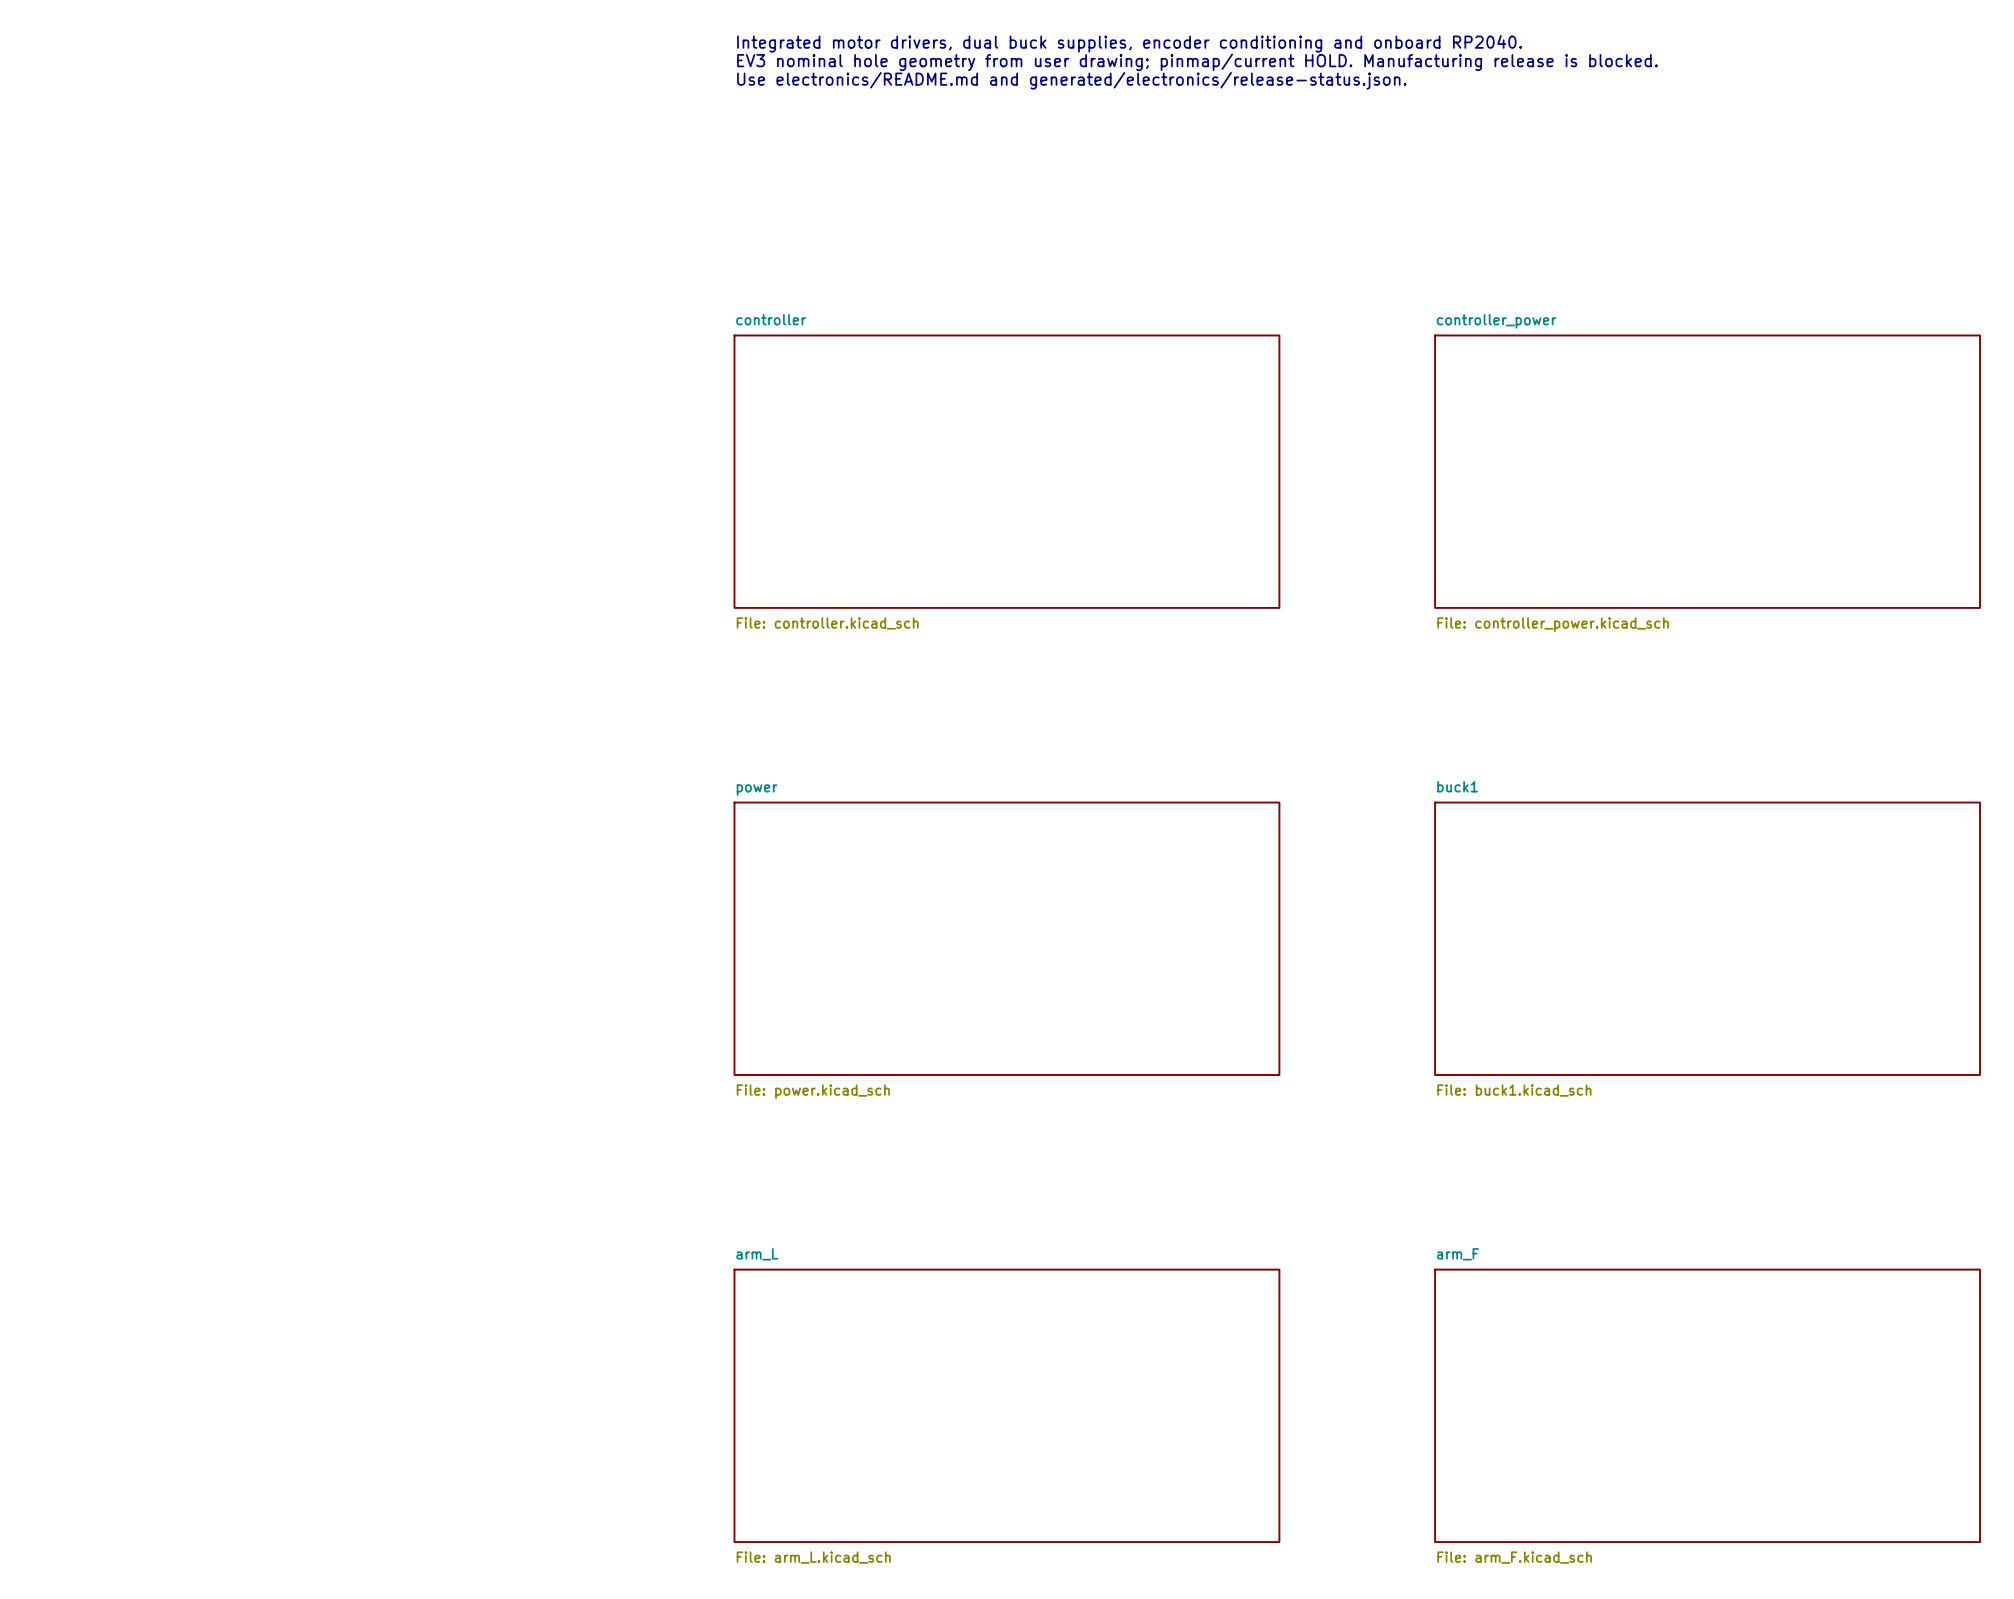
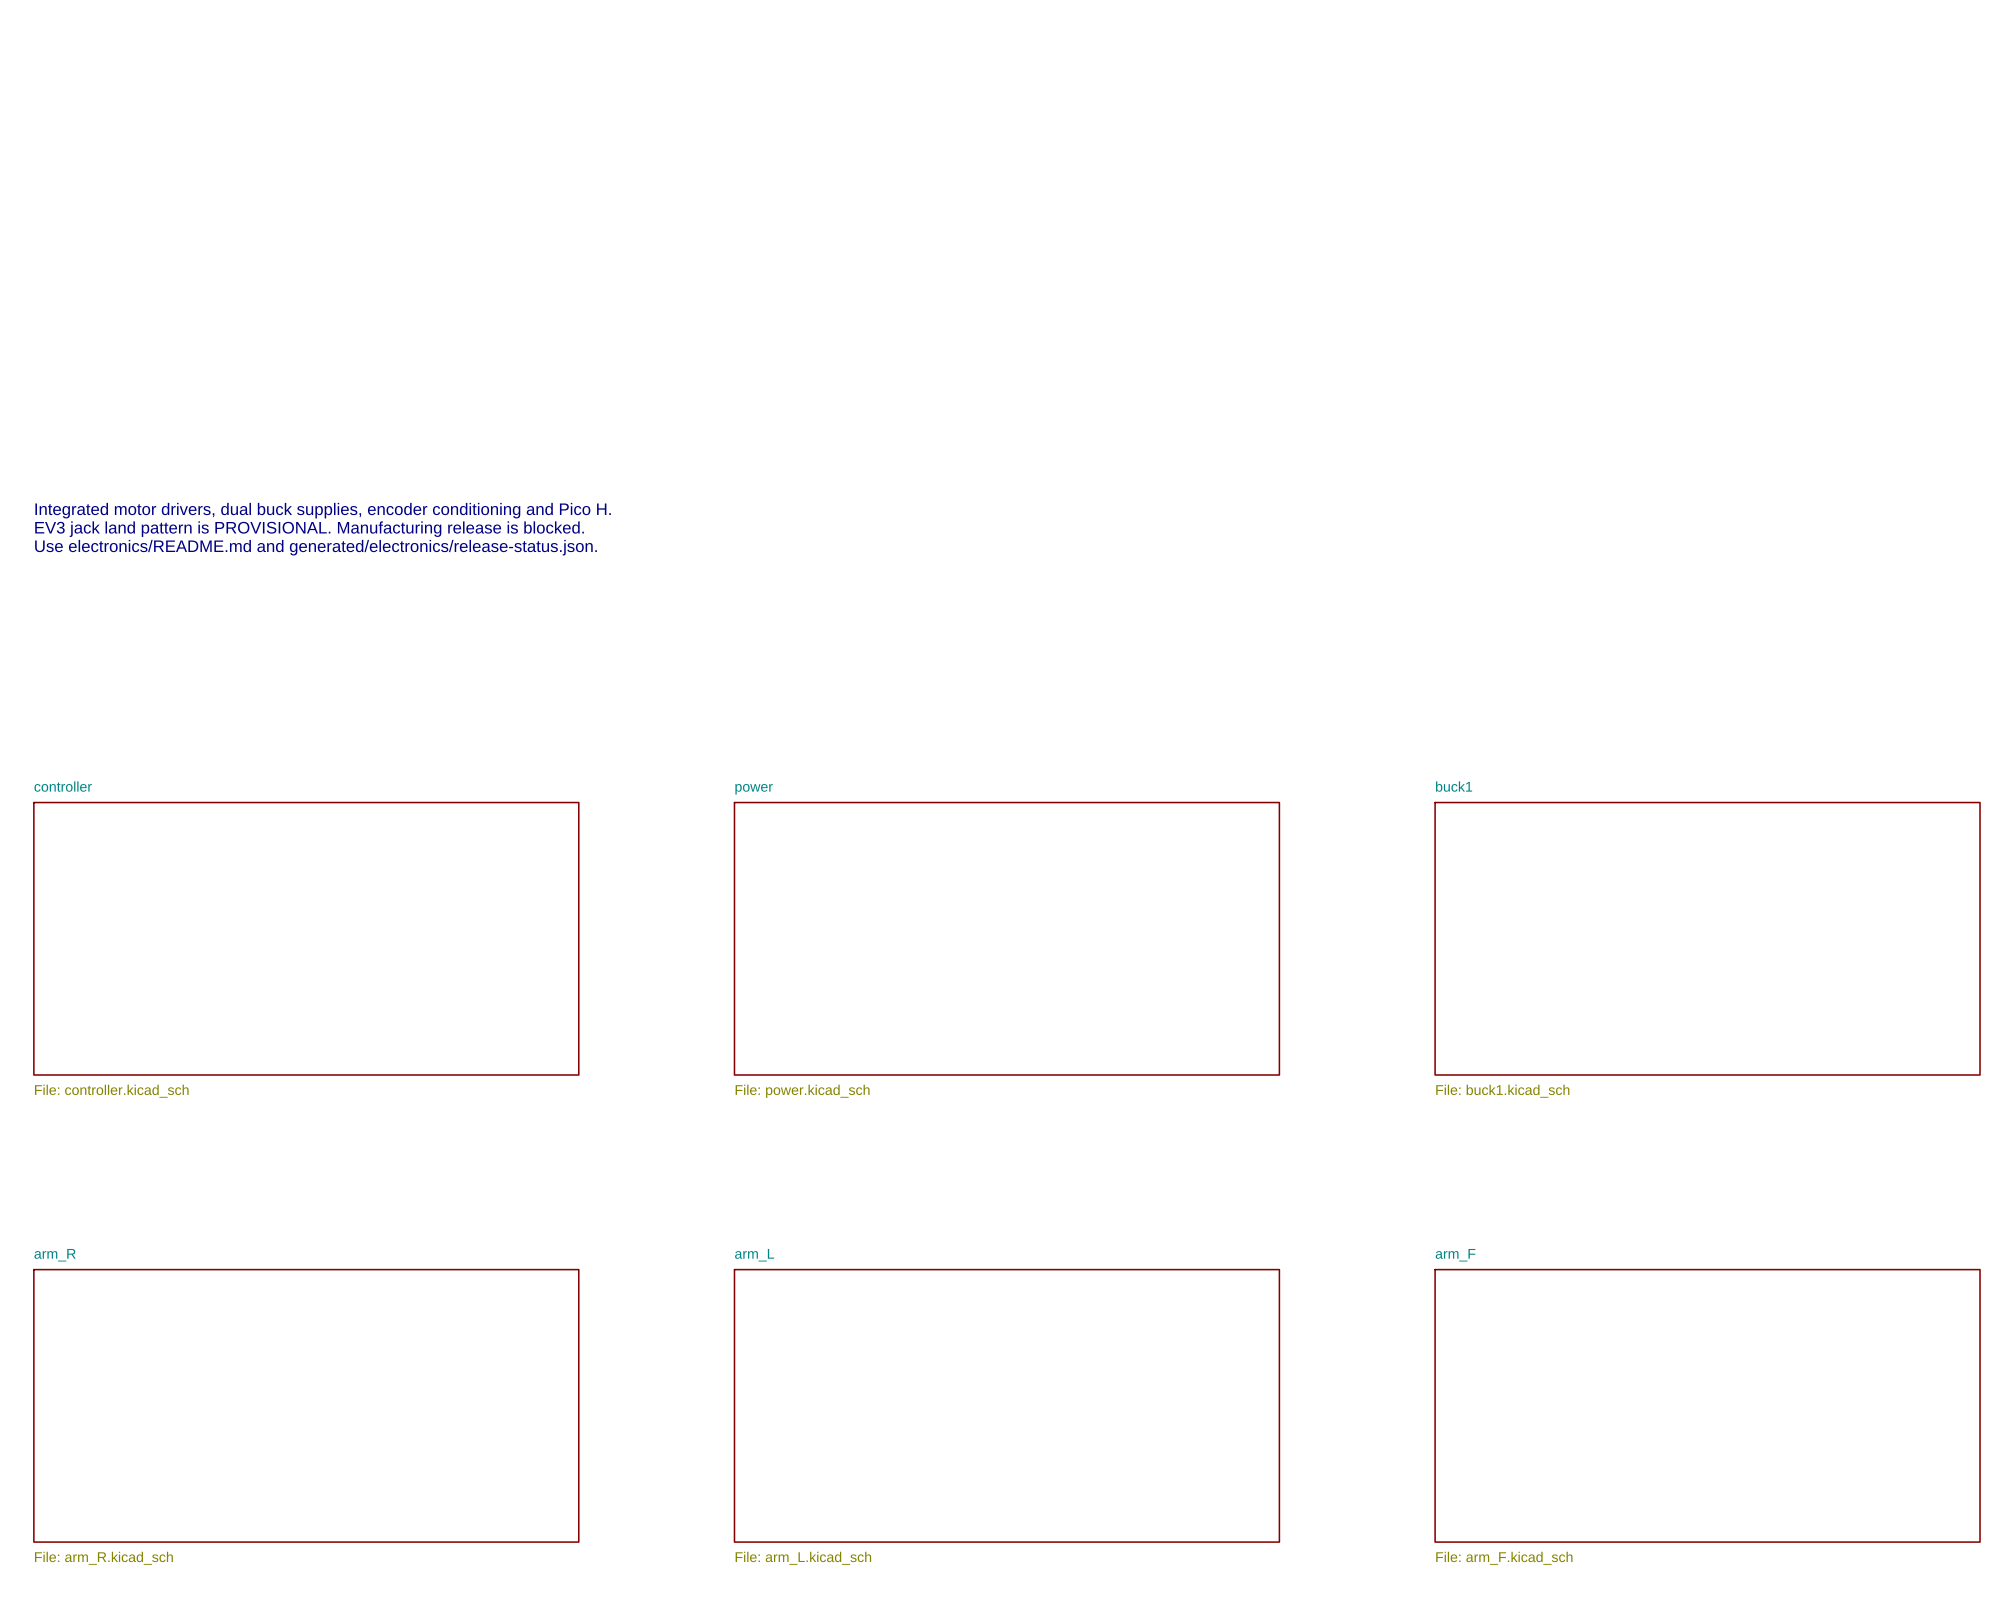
text: Integrated motor drivers, dual buck supplies, encoder conditioning and onboard RP2040. (1129, 43) -> none
text: EV3 nominal hole geometry from user drawing; pinmap/current HOLD. Manufacturing release is blocked. (1197, 62) -> none
text: Use electronics/README.md and generated/electronics/release-status.json. (1071, 80) -> none
sheet controller: File: controller.kicad_sch (1006, 471) -> none
sheet controller_power: File: controller_power.kicad_sch (1707, 471) -> none
text: none -> Integrated motor drivers, dual buck supplies, encoder conditioning and Pico H. (323, 510)
text: none -> EV3 jack land pattern is PROVISIONAL. Manufacturing release is blocked. (309, 529)
text: none -> Use electronics/README.md and generated/electronics/release-status.json. (316, 547)
sheet controller: none -> File: controller.kicad_sch (306, 938)
sheet arm_R: none -> File: arm_R.kicad_sch (306, 1405)

